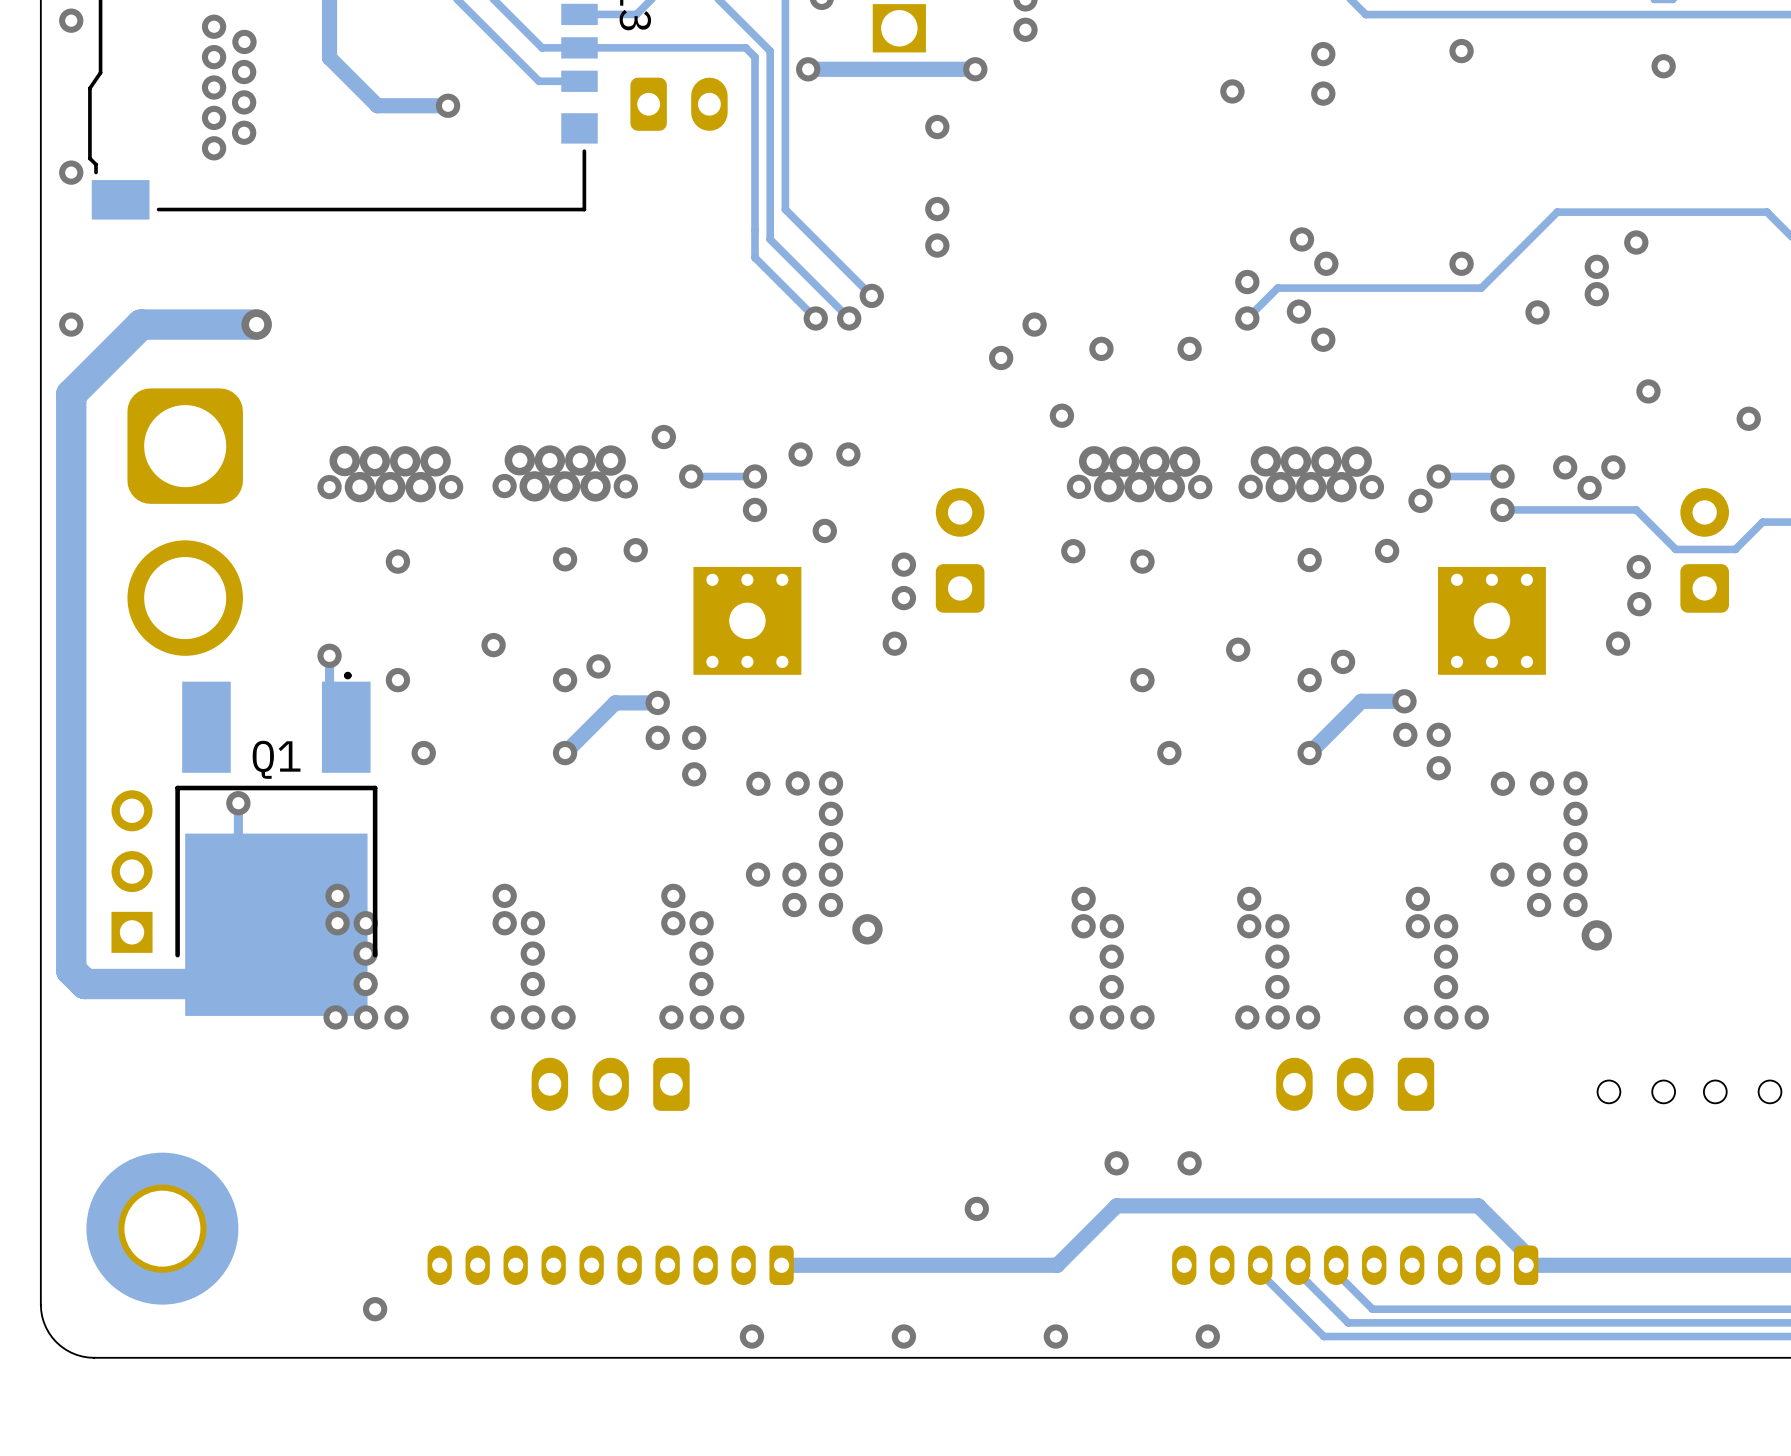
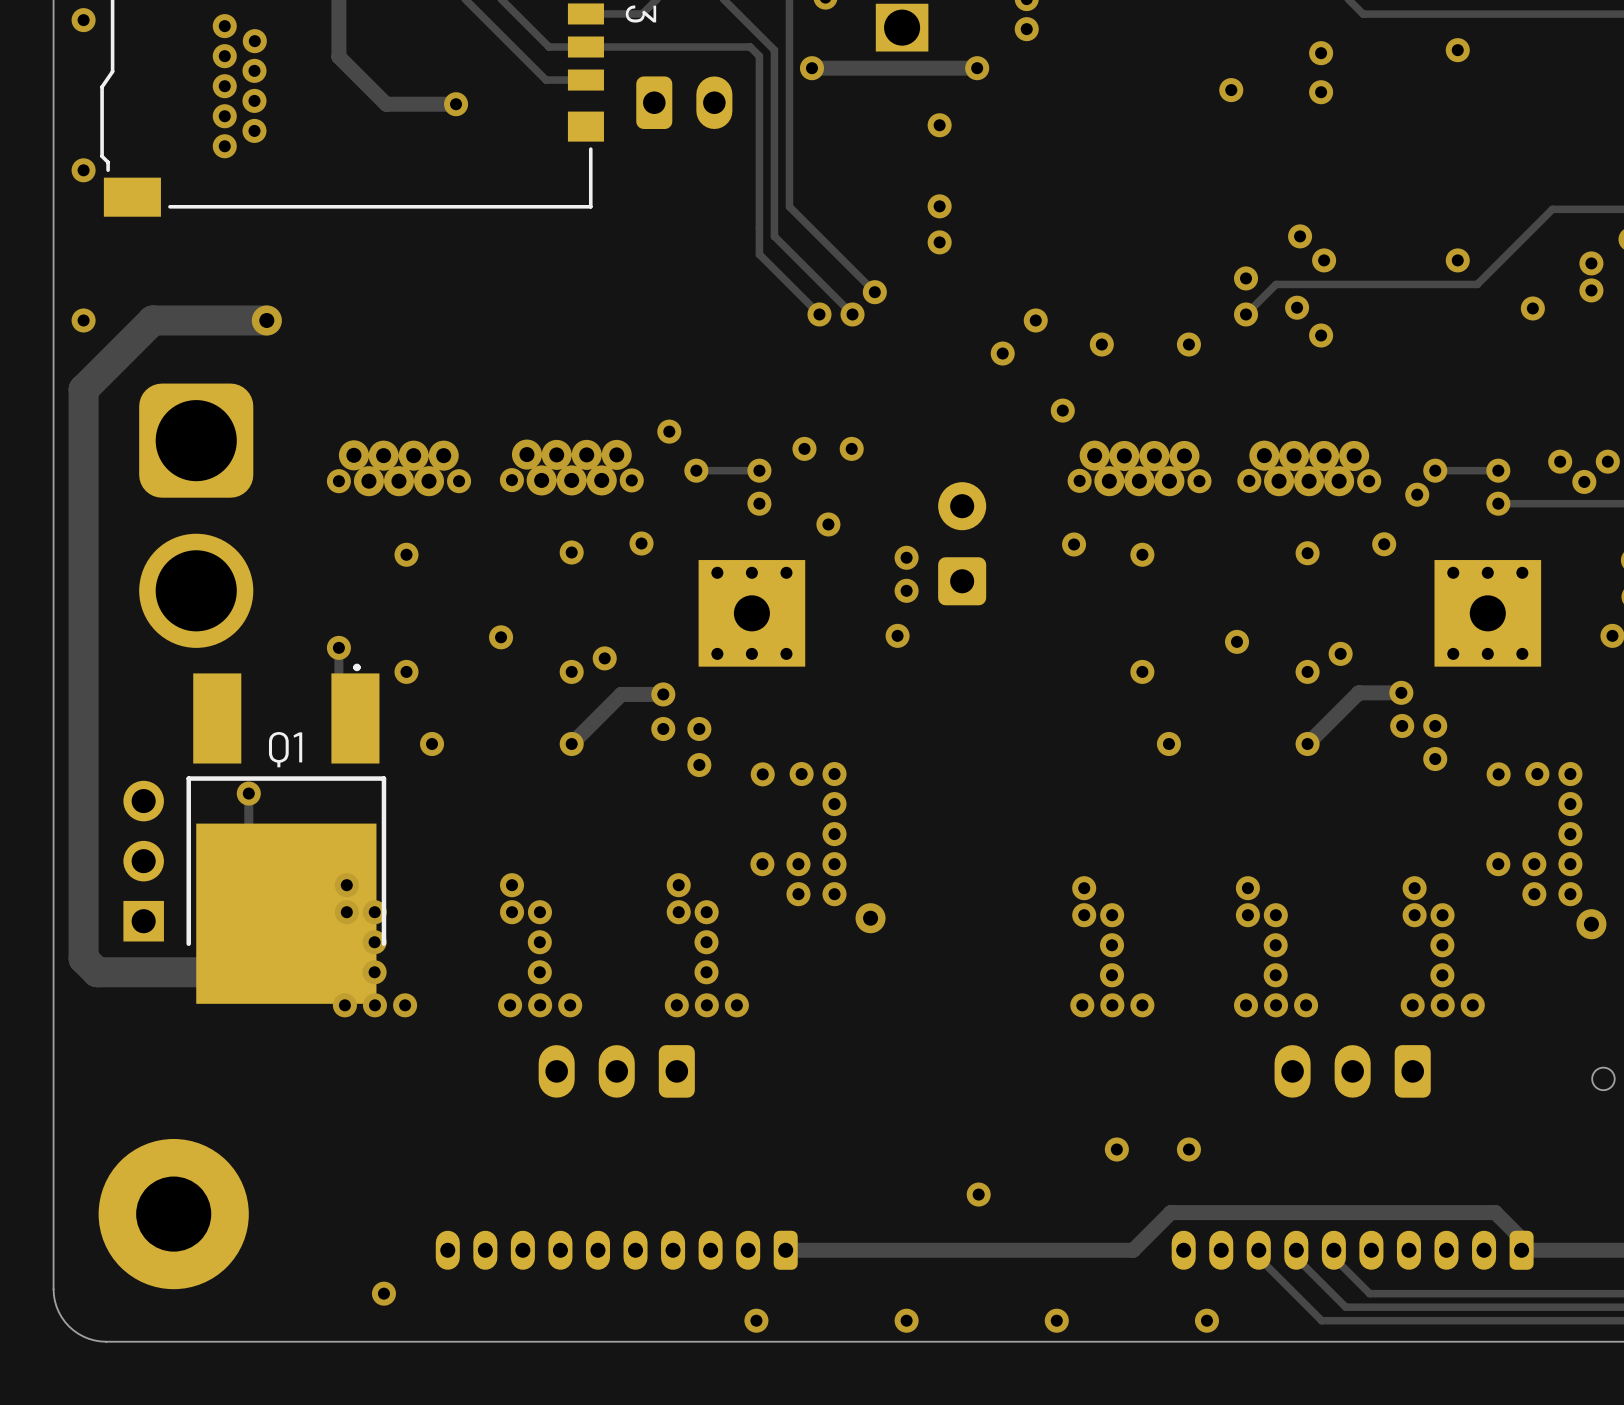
track: (1499, 1227) (1478, 1205) (1116, 1205) (1057, 1265) -> (1495, 1212) (1170, 1212) (1133, 1250) (1058, 1250)

